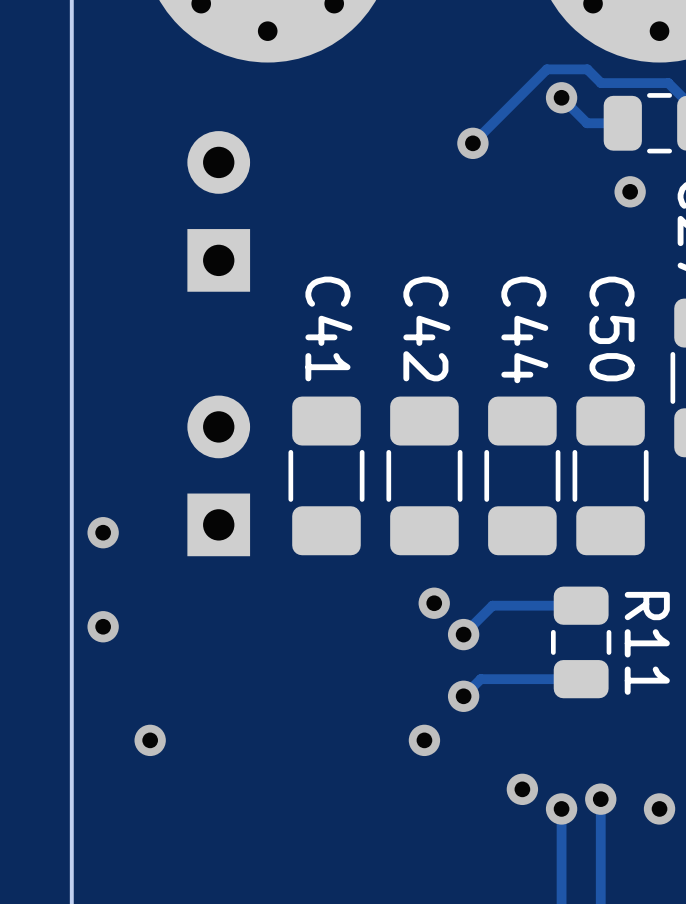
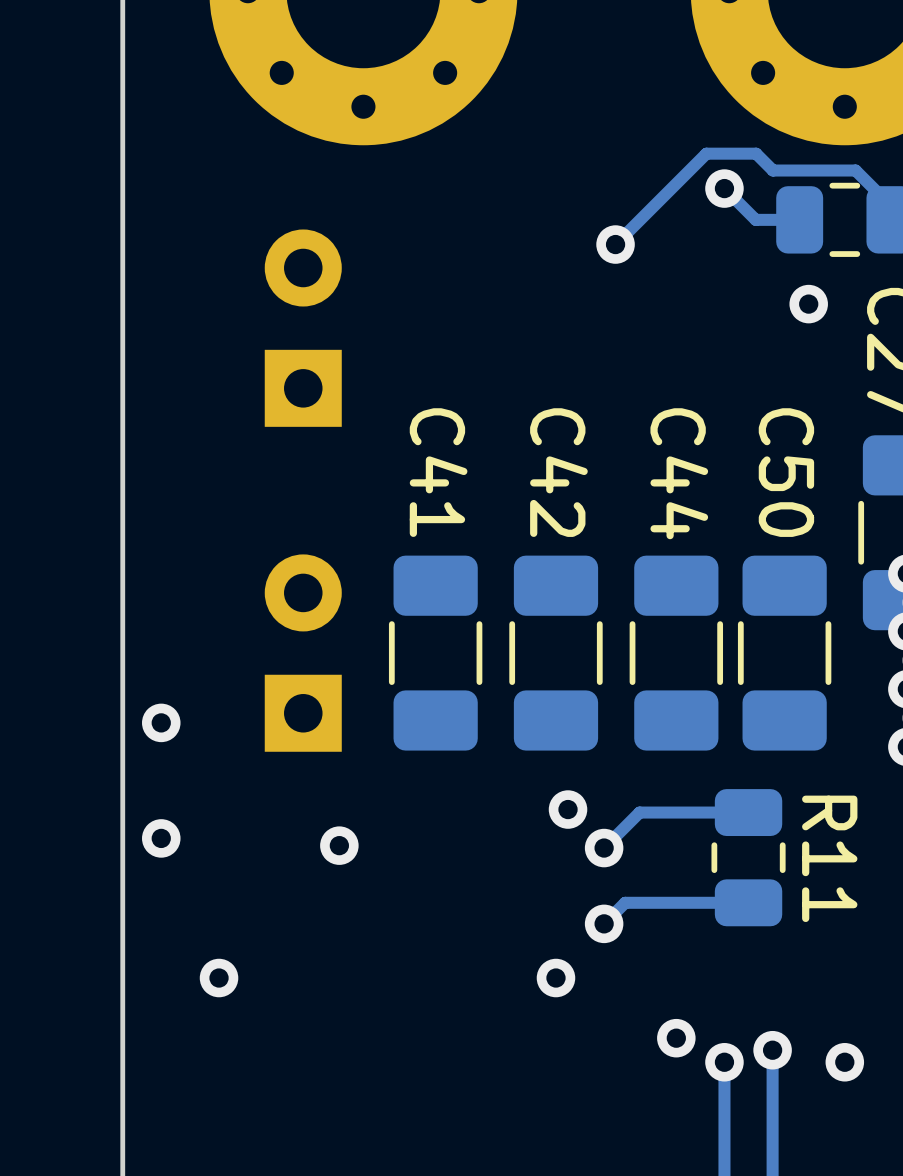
via: none -> (339, 845)

